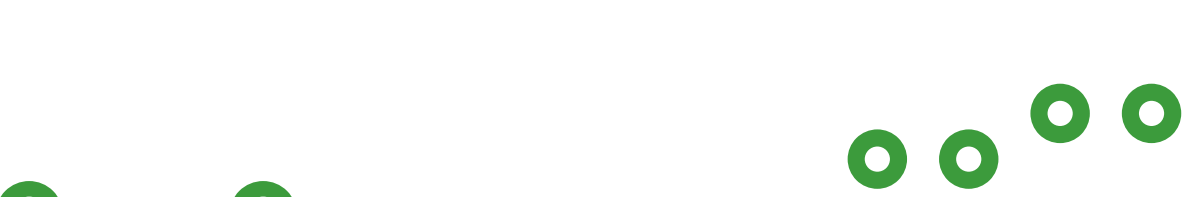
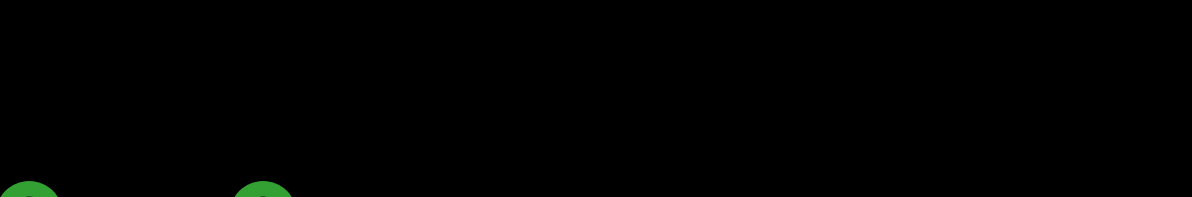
part: (1105, 113) -> none
part: (923, 159) -> none

